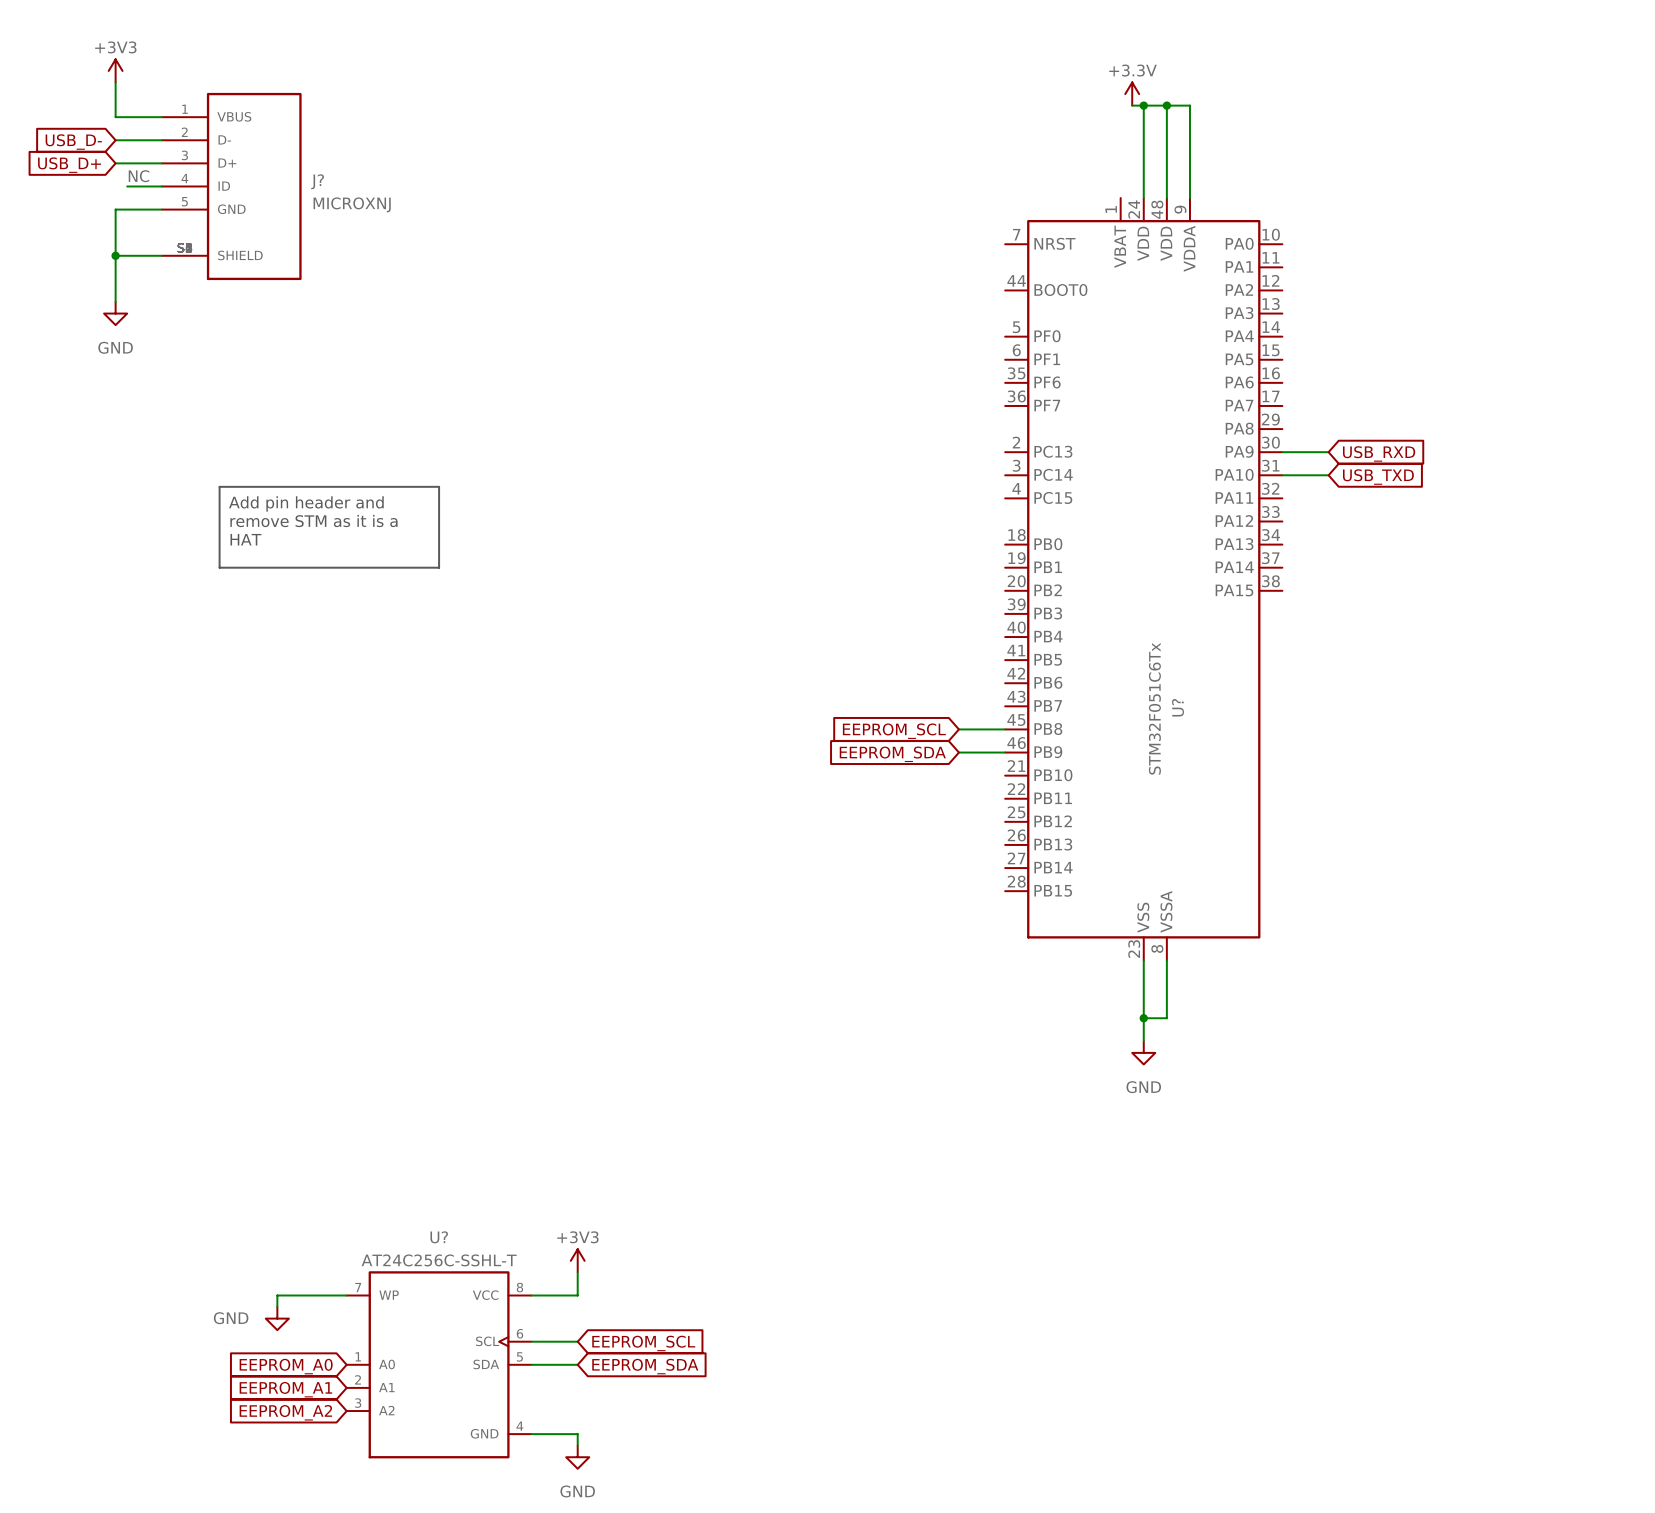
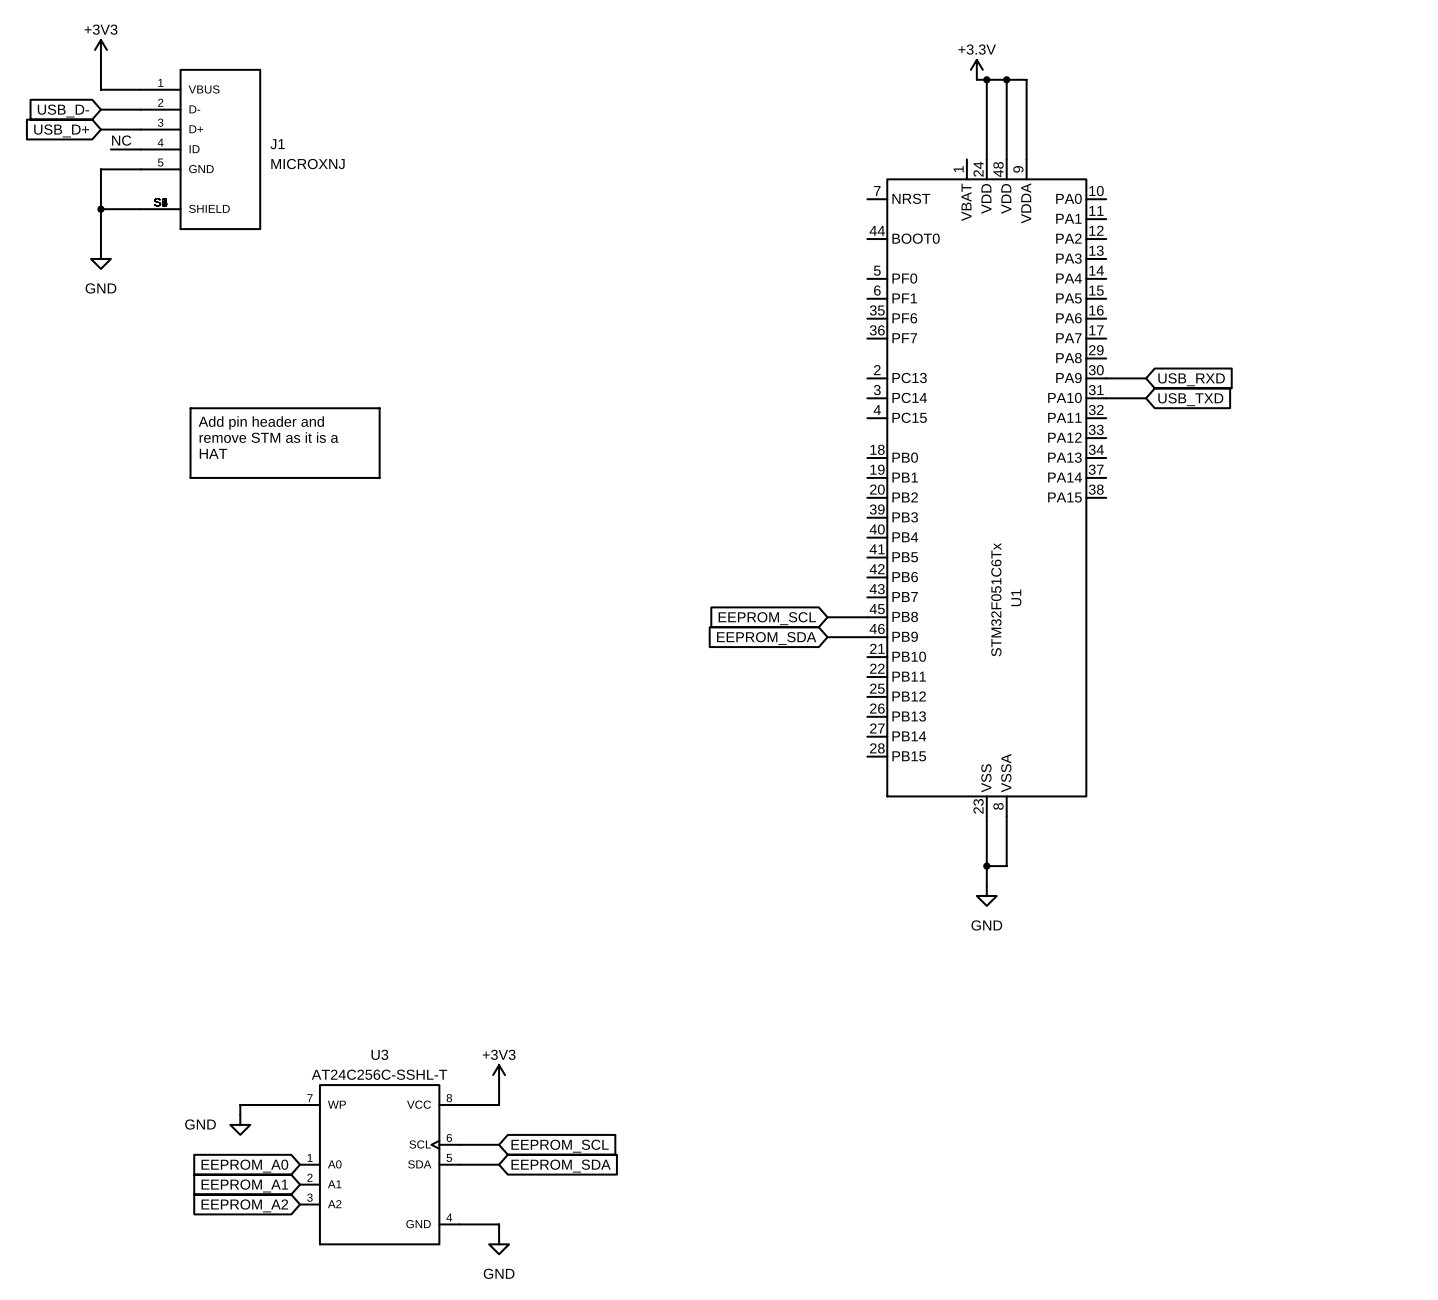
J? name: J? (317, 181) -> J1 (277, 144)
U? name: U? (1178, 707) -> U1 (1016, 597)
U? name: U? (439, 1237) -> U3 (379, 1054)

